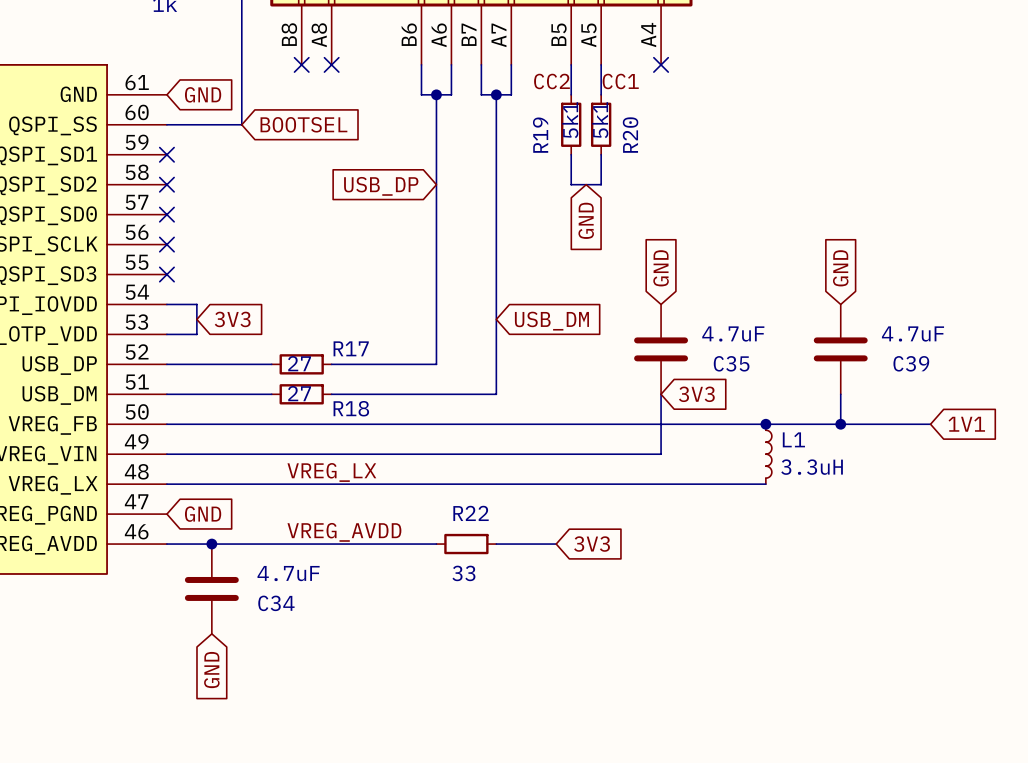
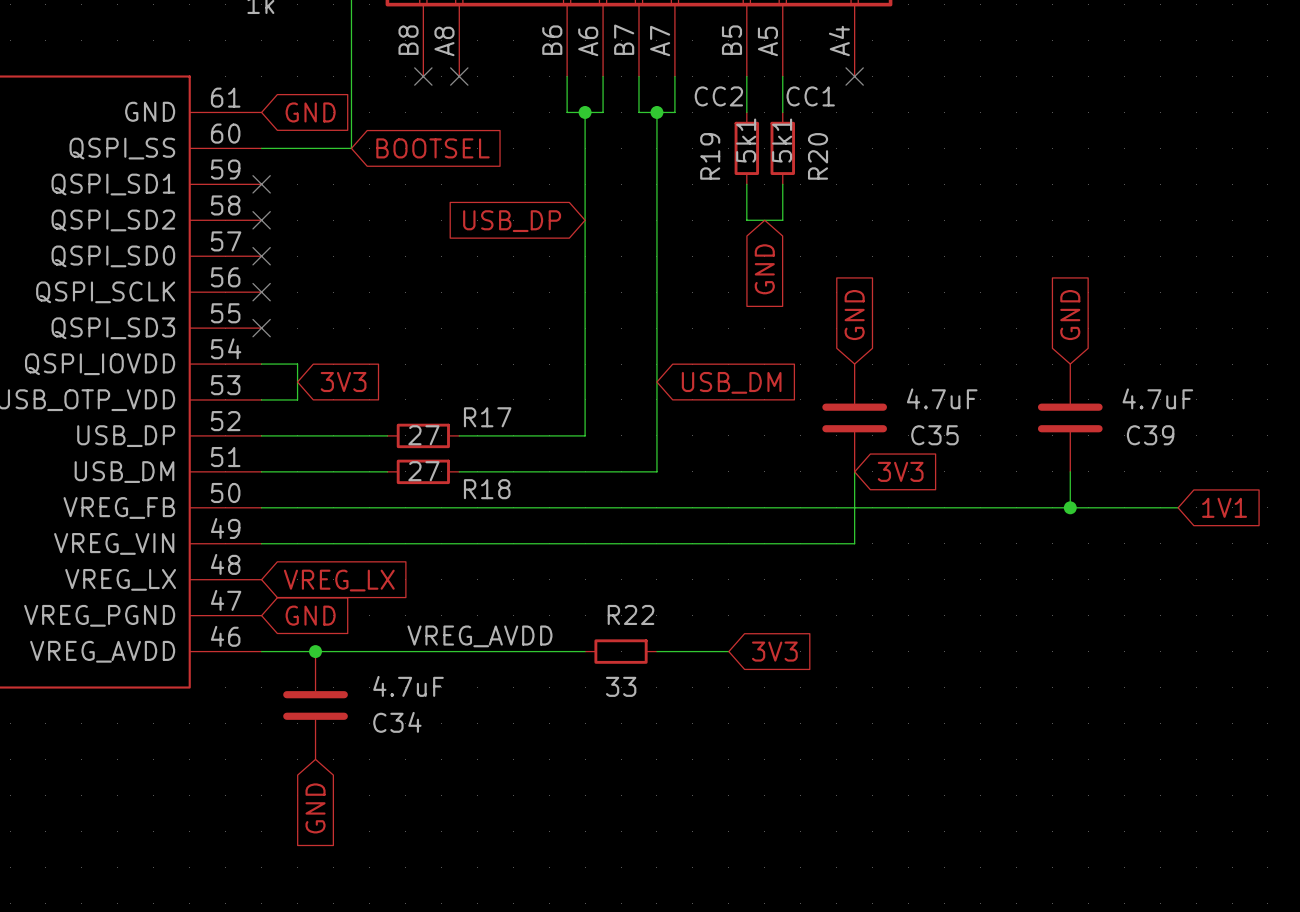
junction: (765, 424) -> none
L1: 3.3uH (768, 454) -> none
label: VREG_LX (331, 472) -> none
wire: (166, 484) (765, 484) -> none
global label: none -> VREG_LX (339, 580)

